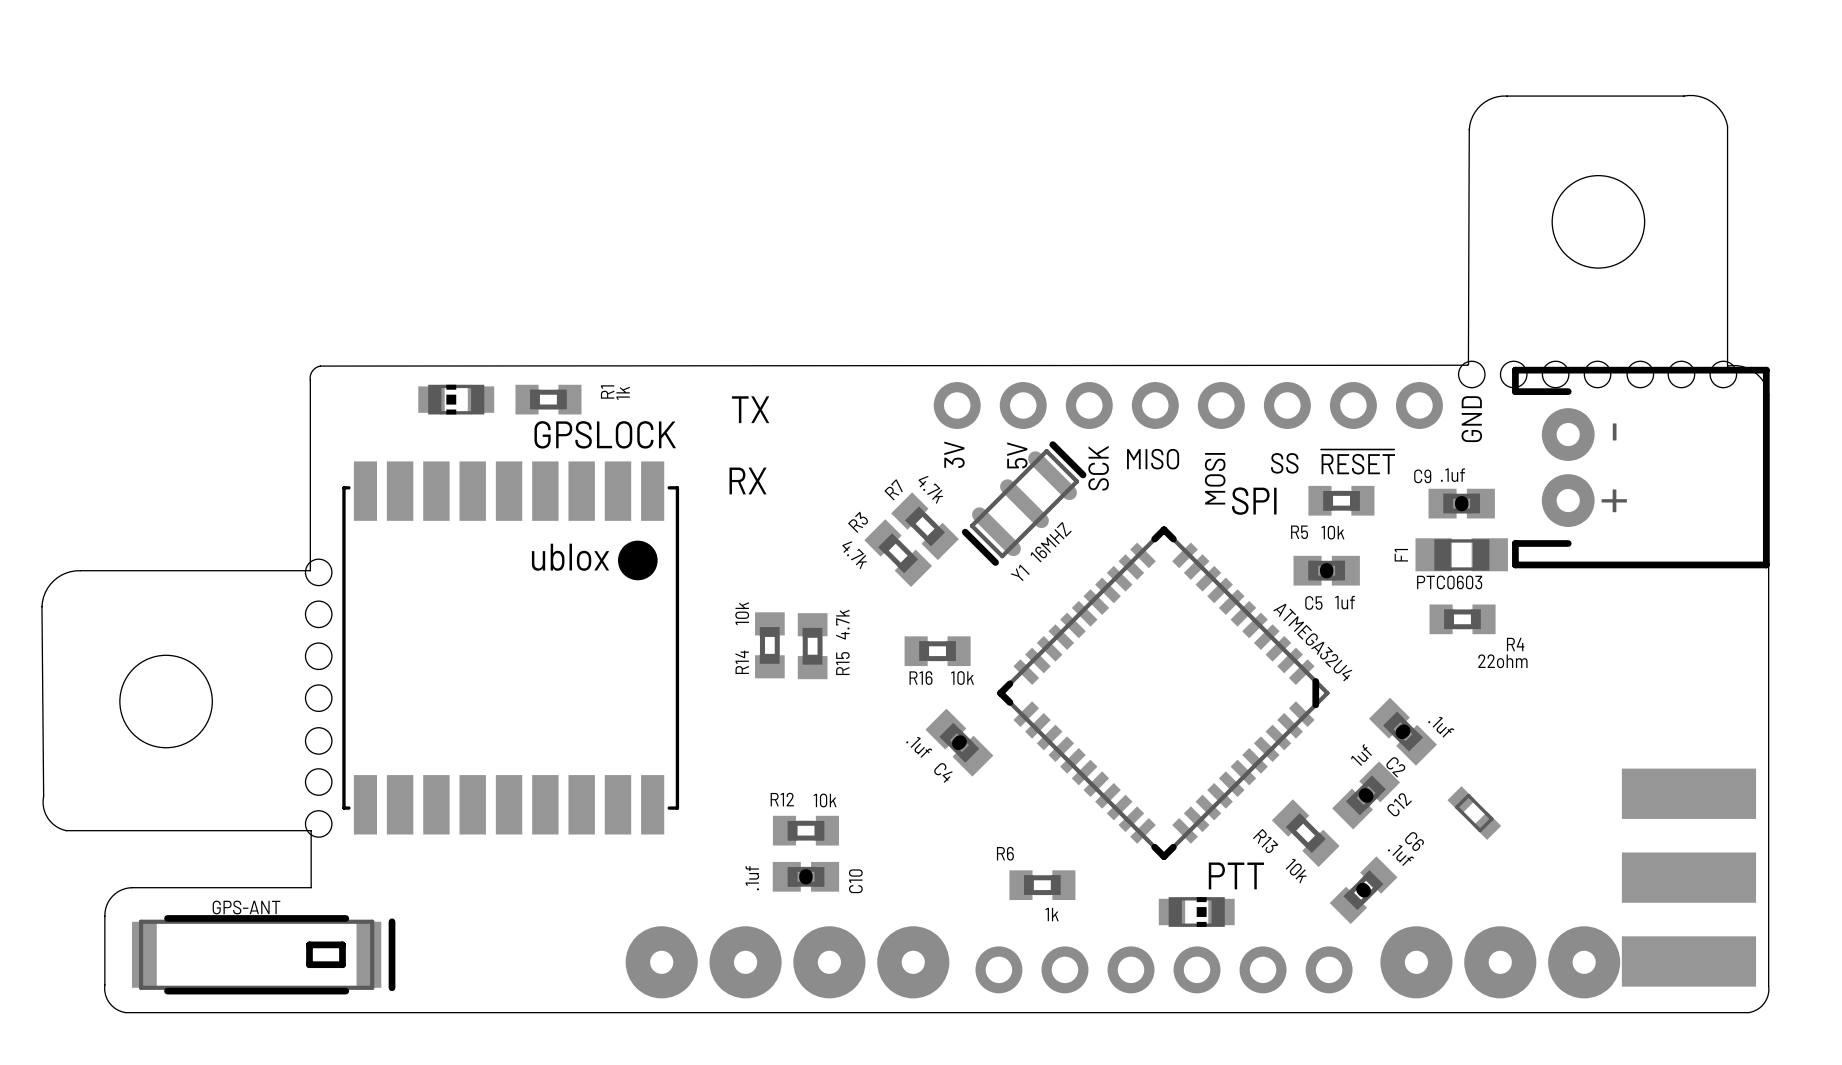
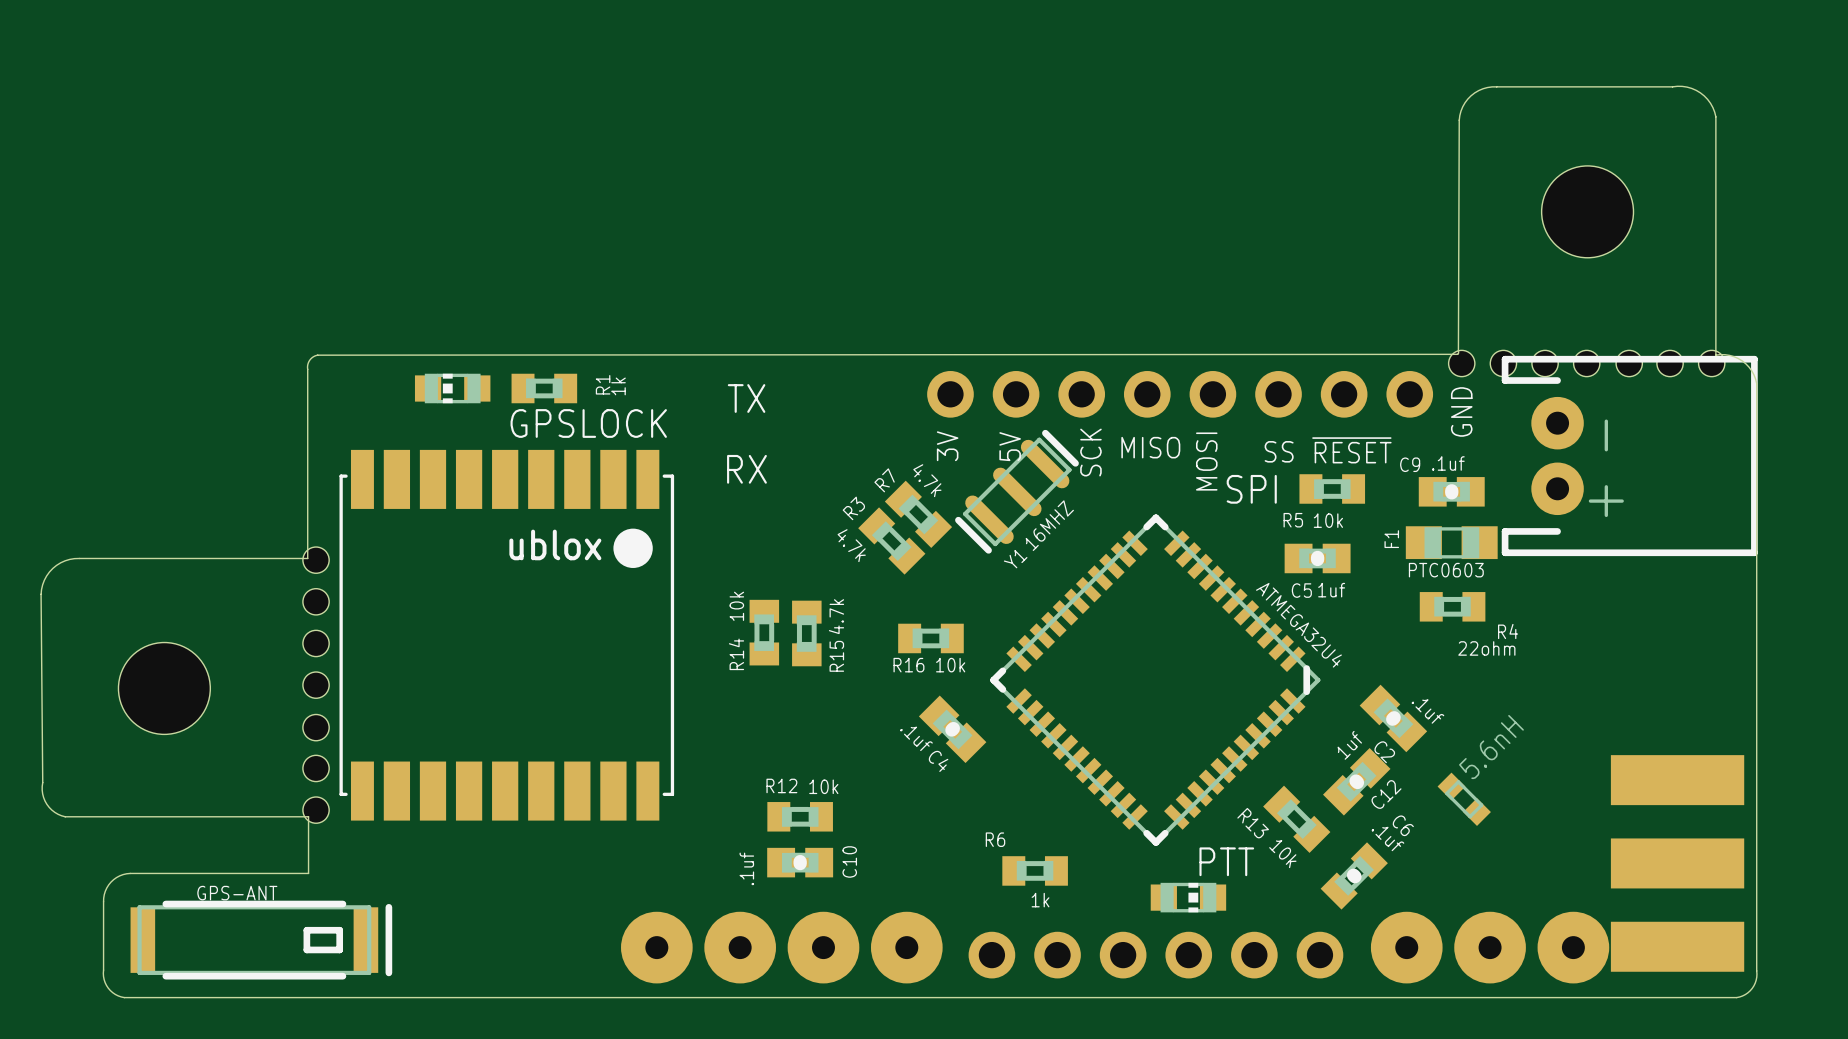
part value: none -> 5.6nH (1491, 747)

